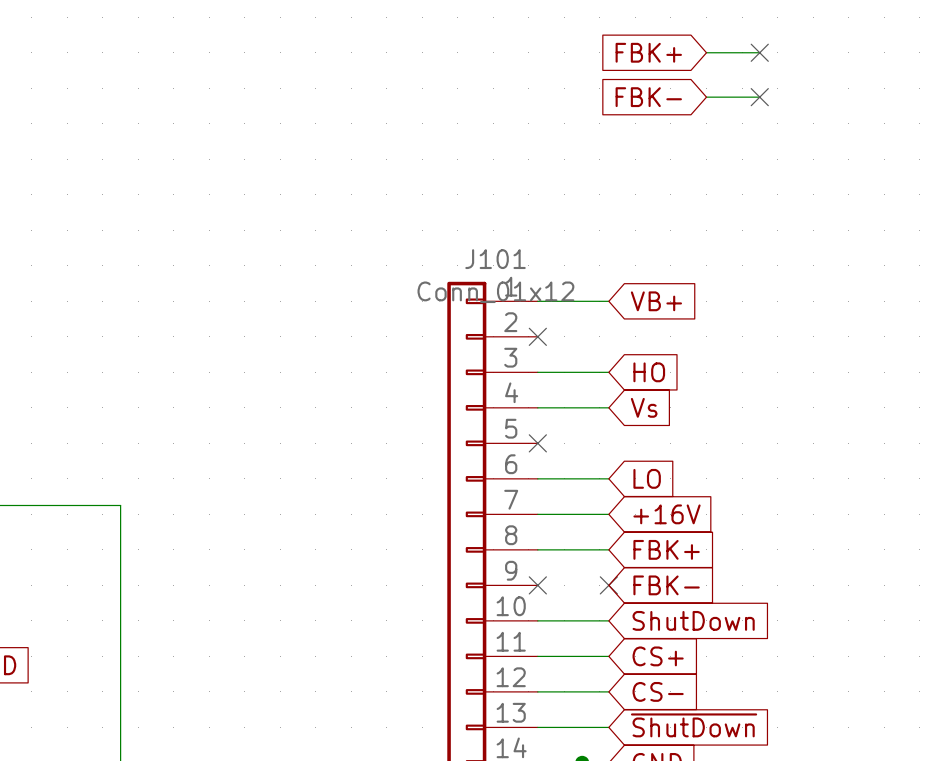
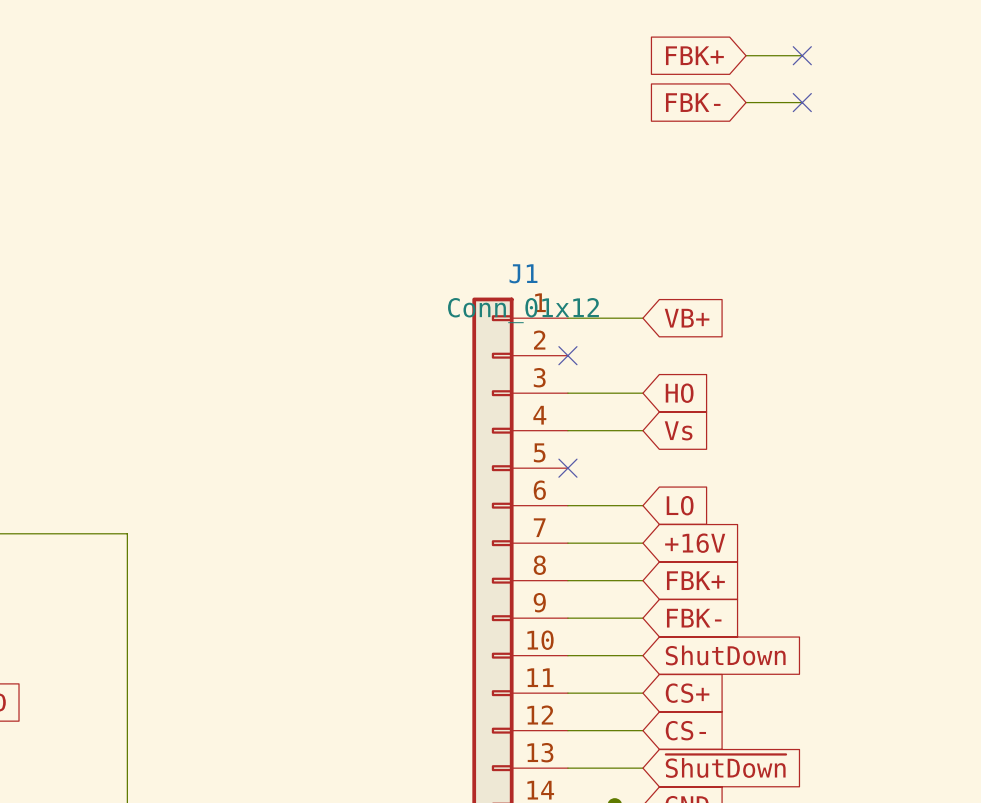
J101 name: J101 (495, 259) -> J1 (523, 273)
wire: none -> (567, 618) (642, 618)
no-connect mark: (537, 585) -> none
no-connect mark: (608, 585) -> none

